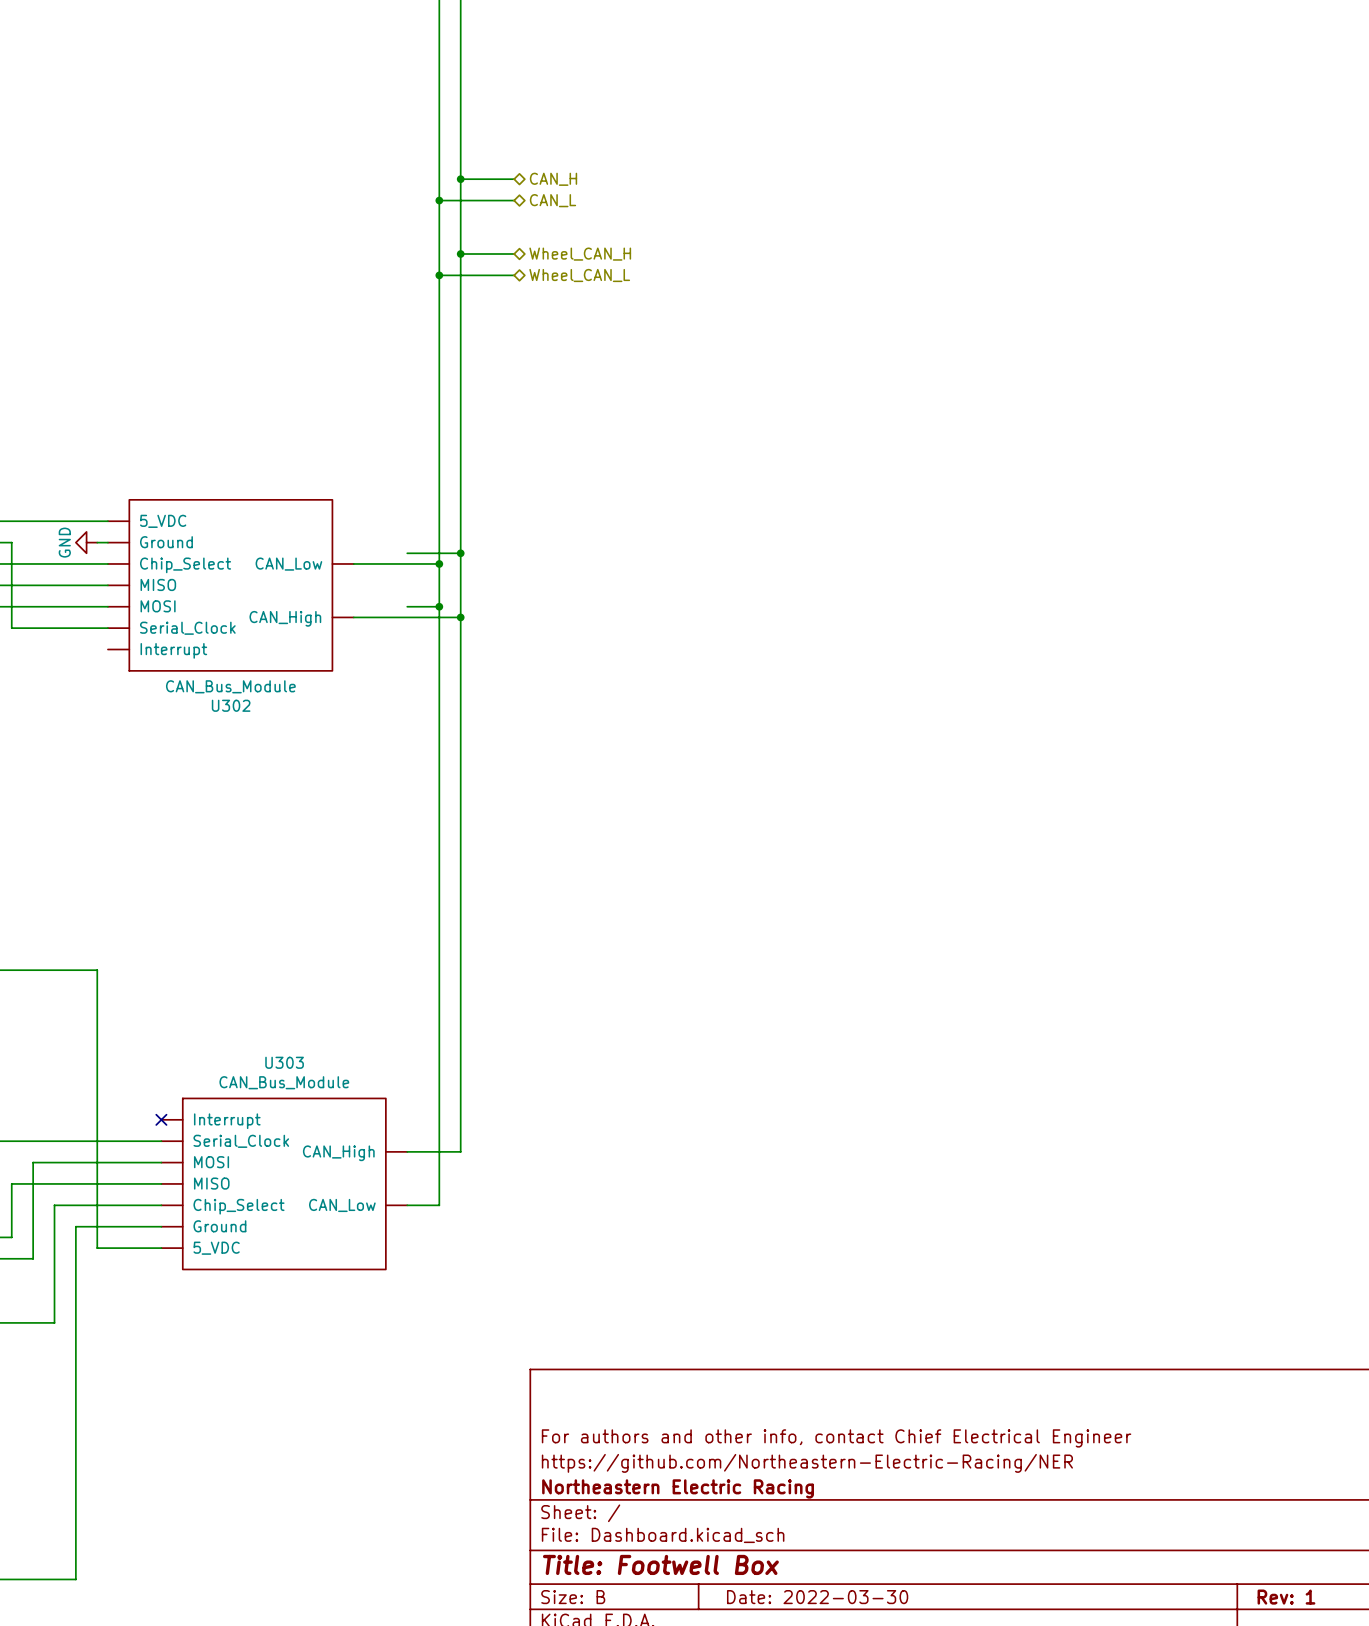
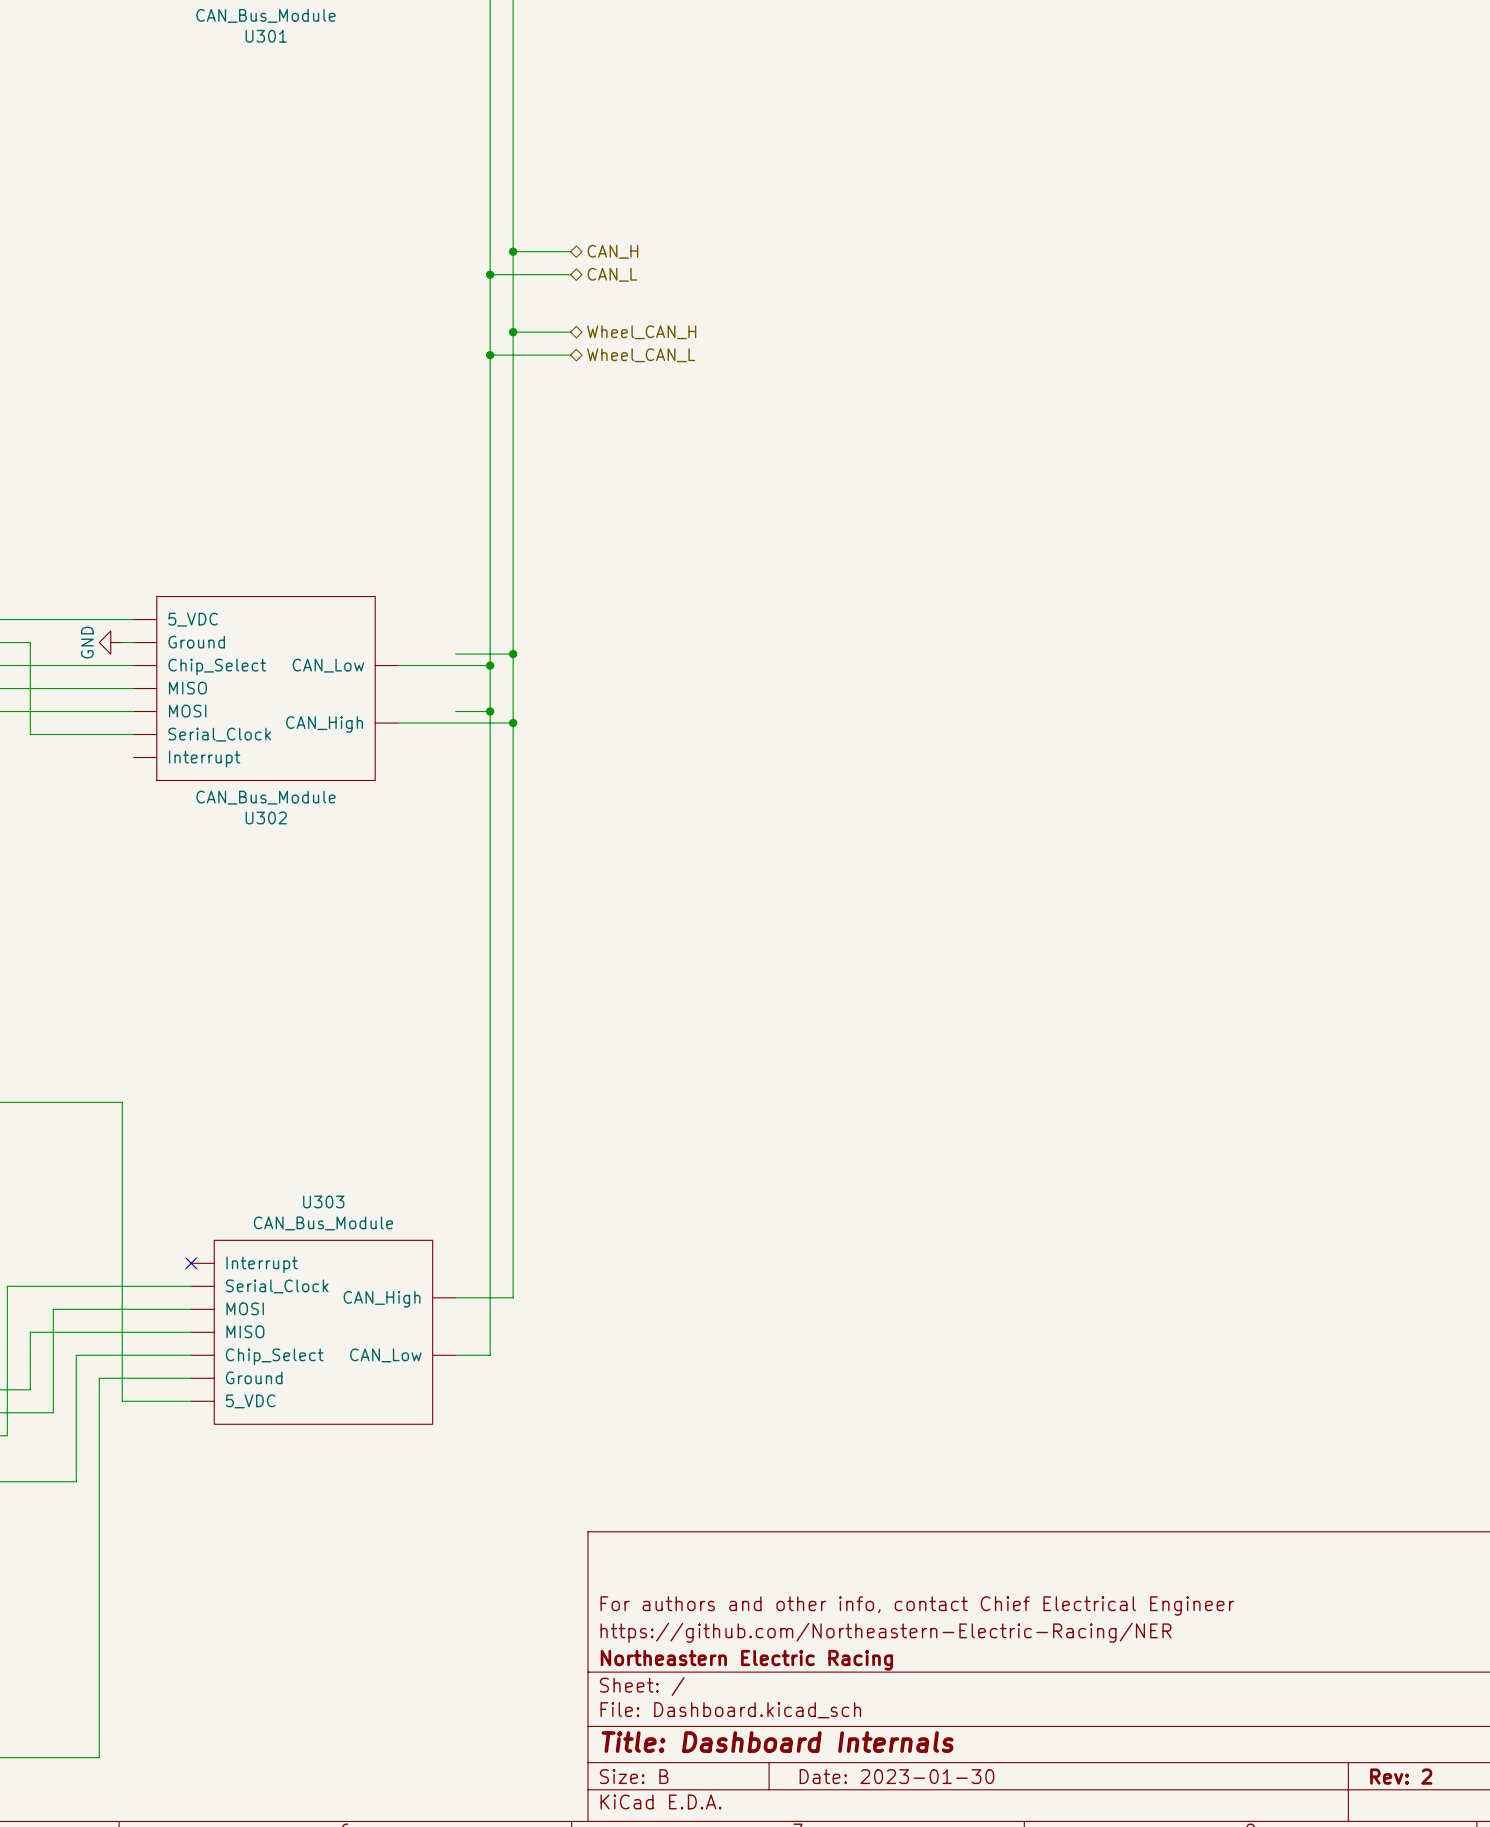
title block: Title: Footwell Box (660, 1564) -> Title: Dashboard Internals (777, 1742)
title block: Date: 2022-03-30 (817, 1597) -> Date: 2023-01-30 (896, 1776)
title block: Rev: 1 (1286, 1597) -> Rev: 2 (1401, 1776)

